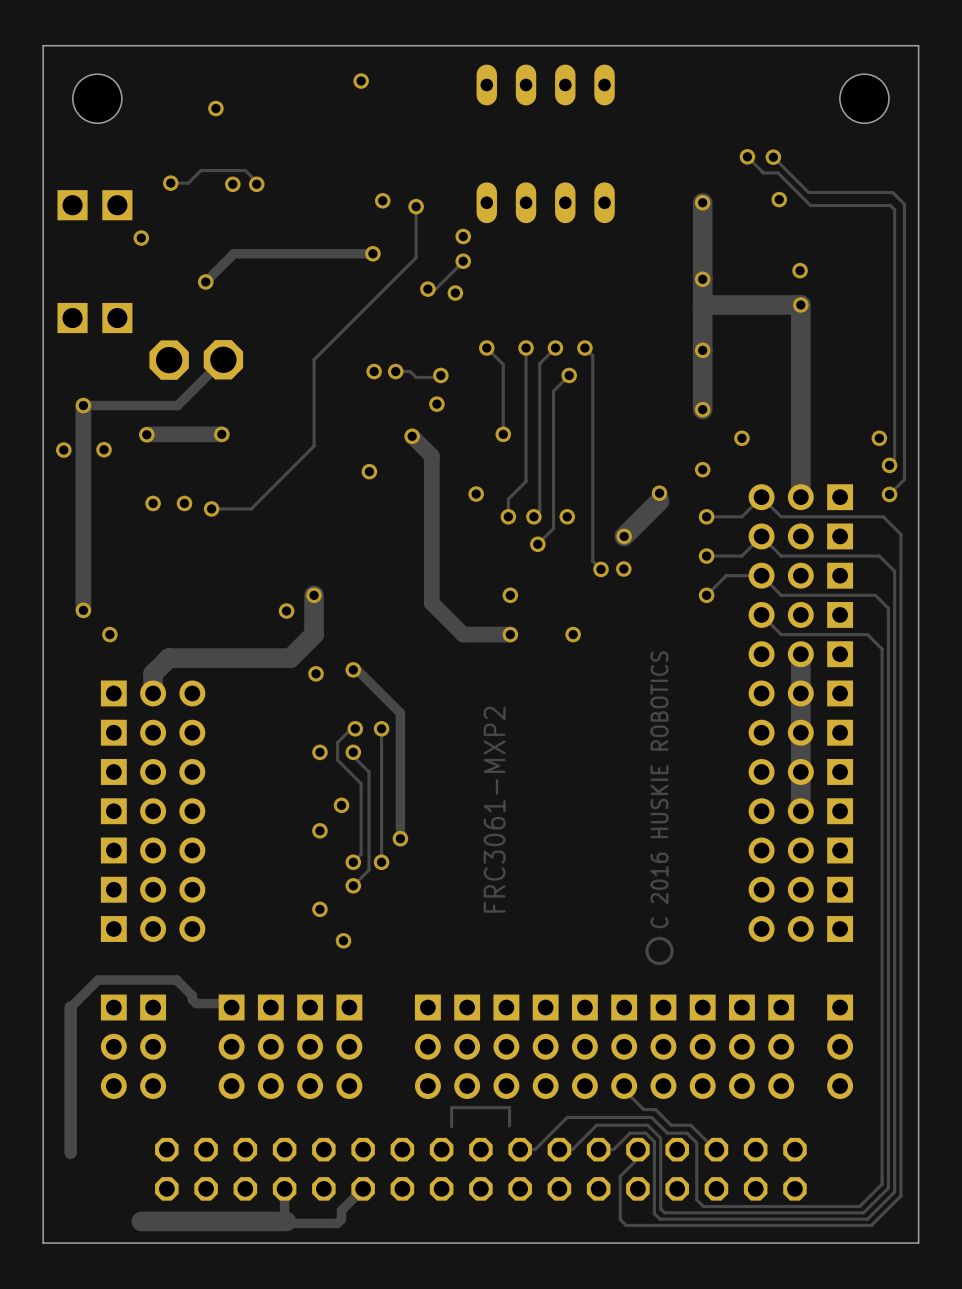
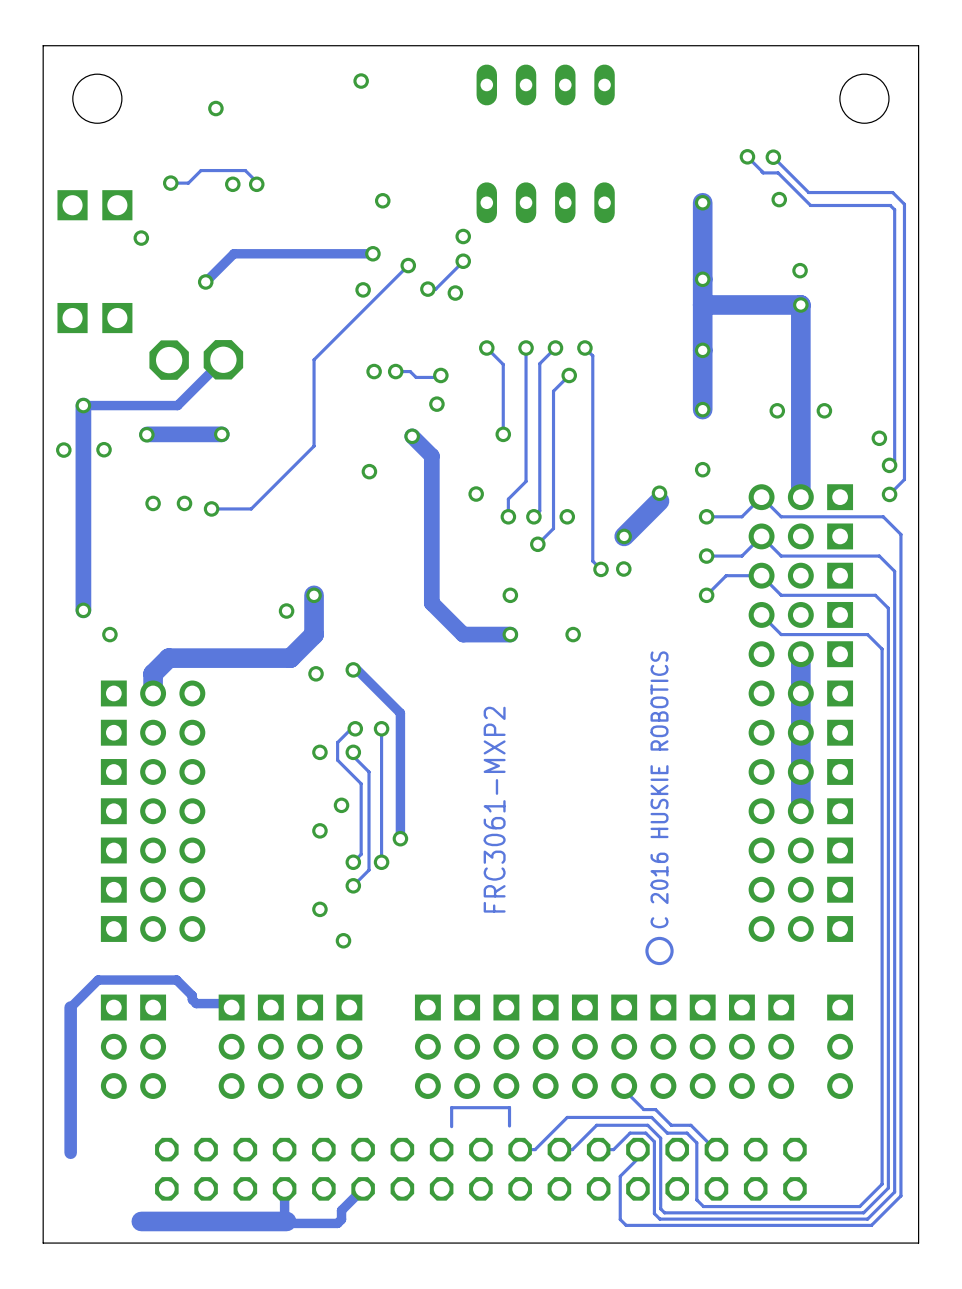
track: (416, 206) (416, 257) (408, 265) -> none
via: (416, 206) -> none
via: none -> (408, 265)
via: none -> (363, 289)
via: none -> (777, 410)
via: none -> (824, 410)
via: (741, 438) -> none

